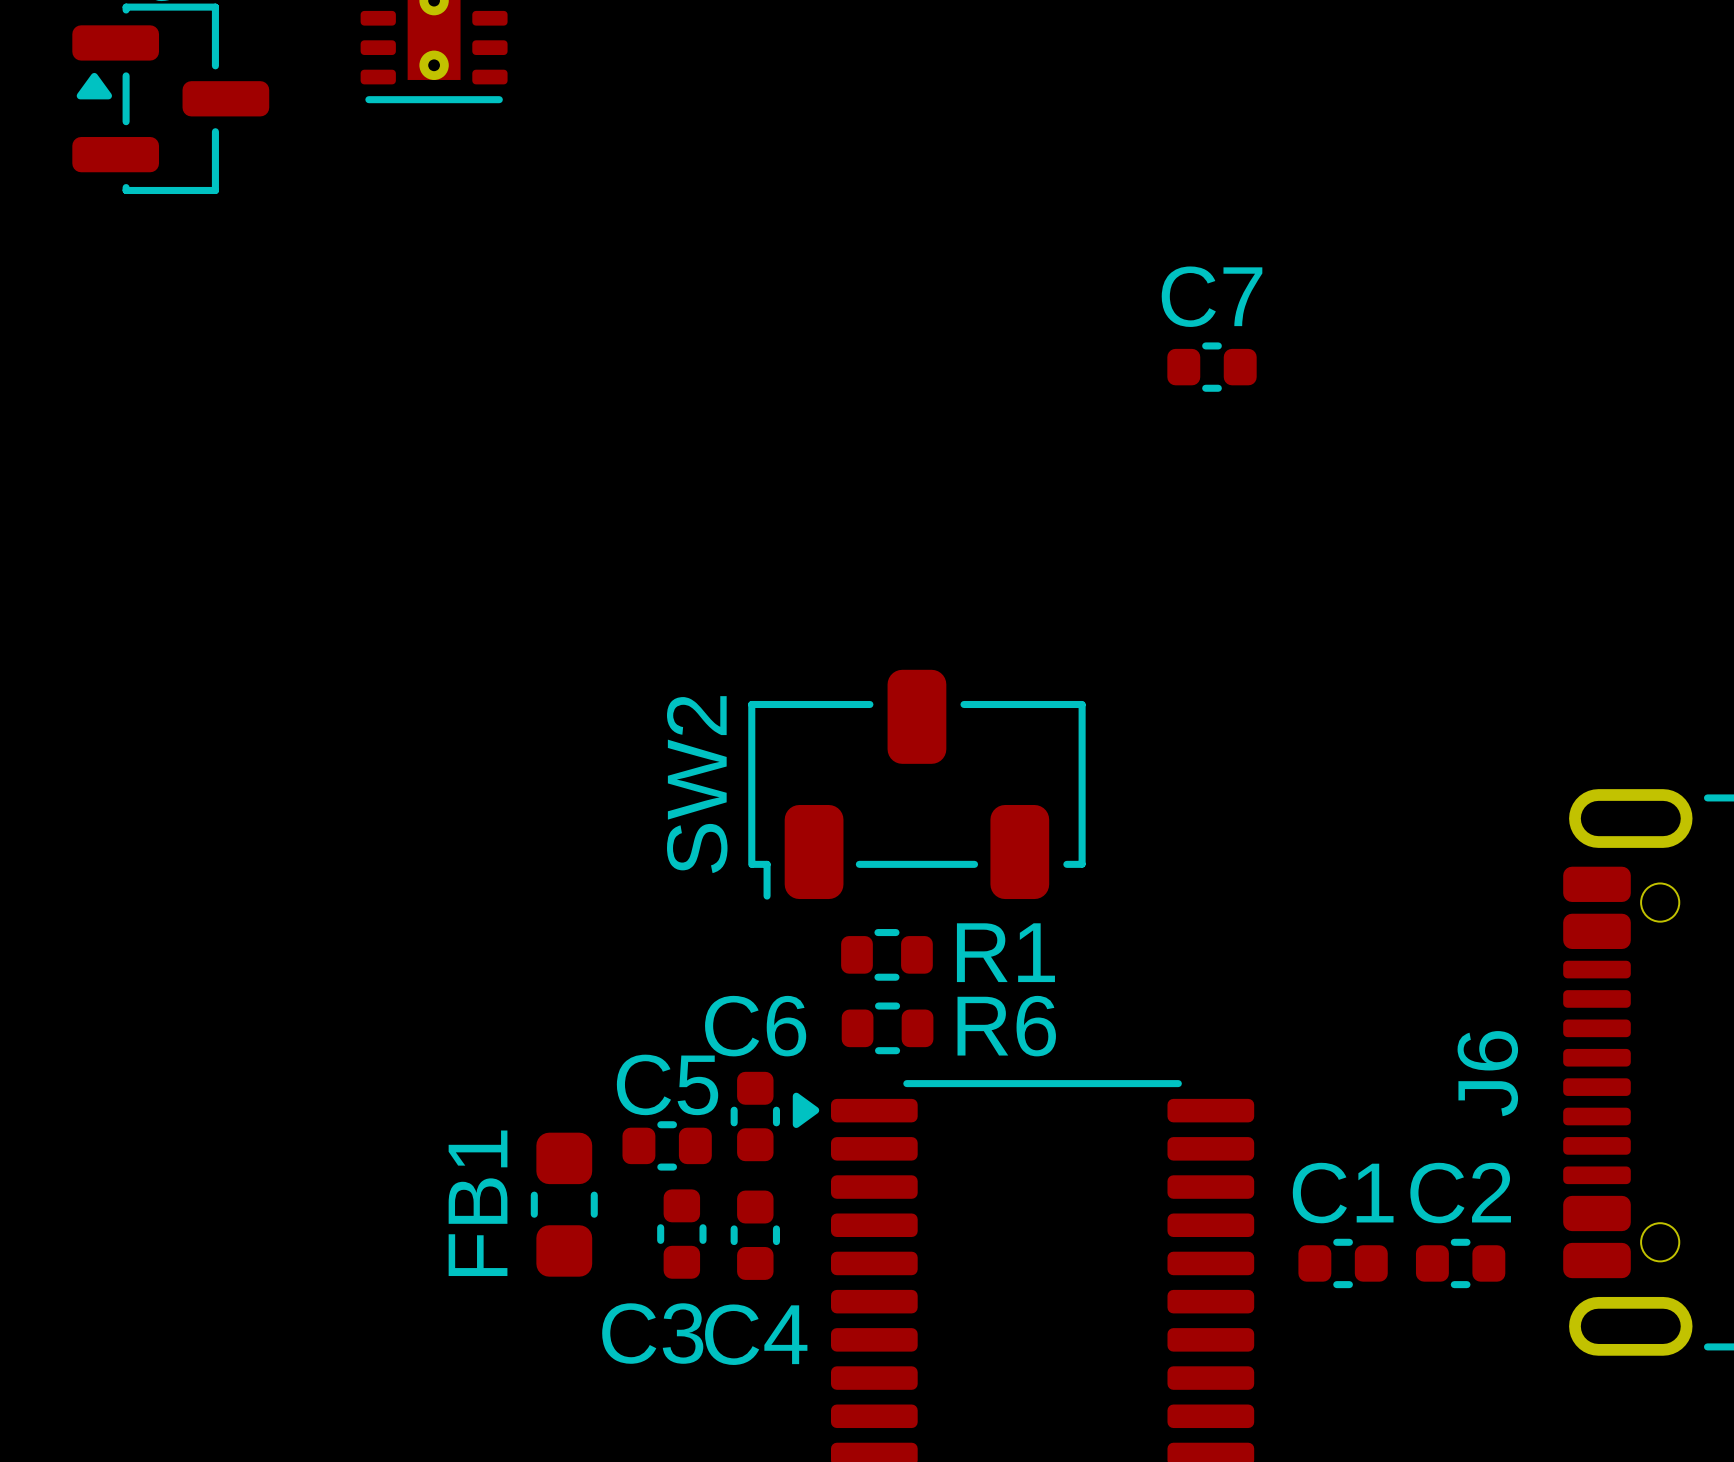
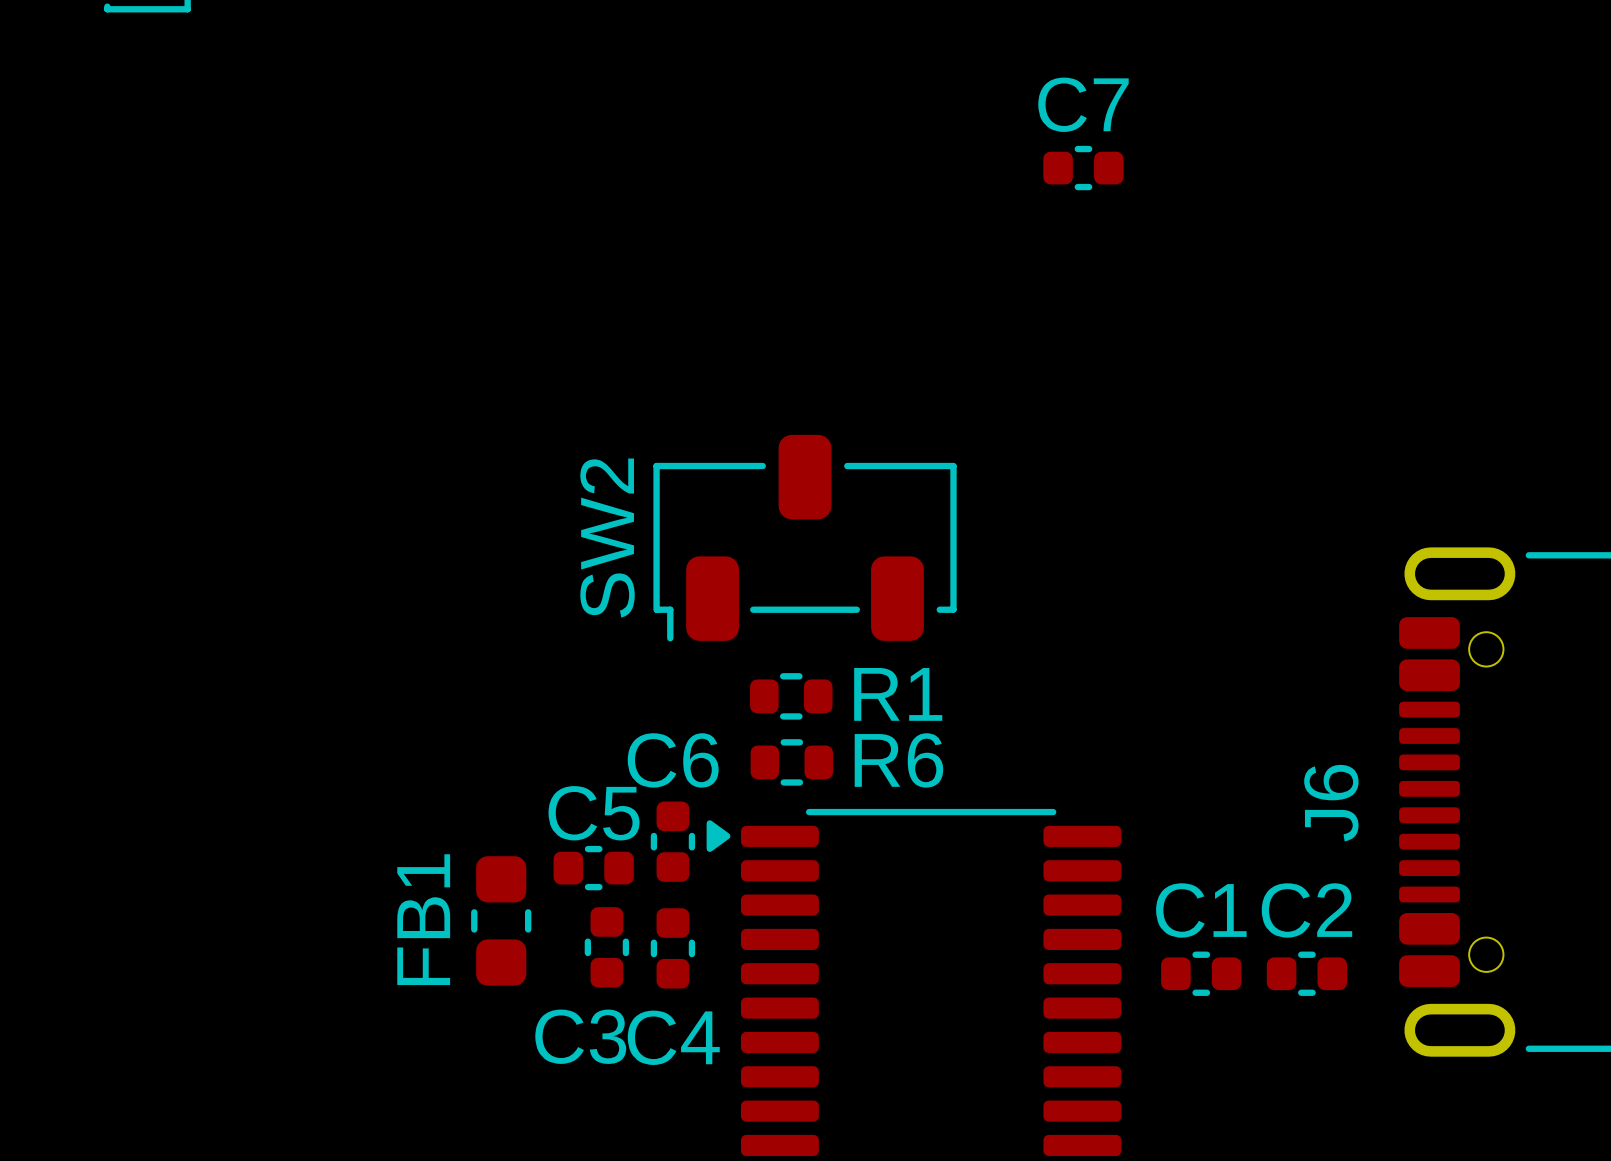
SW2 position: (916, 784) -> (805, 538)

